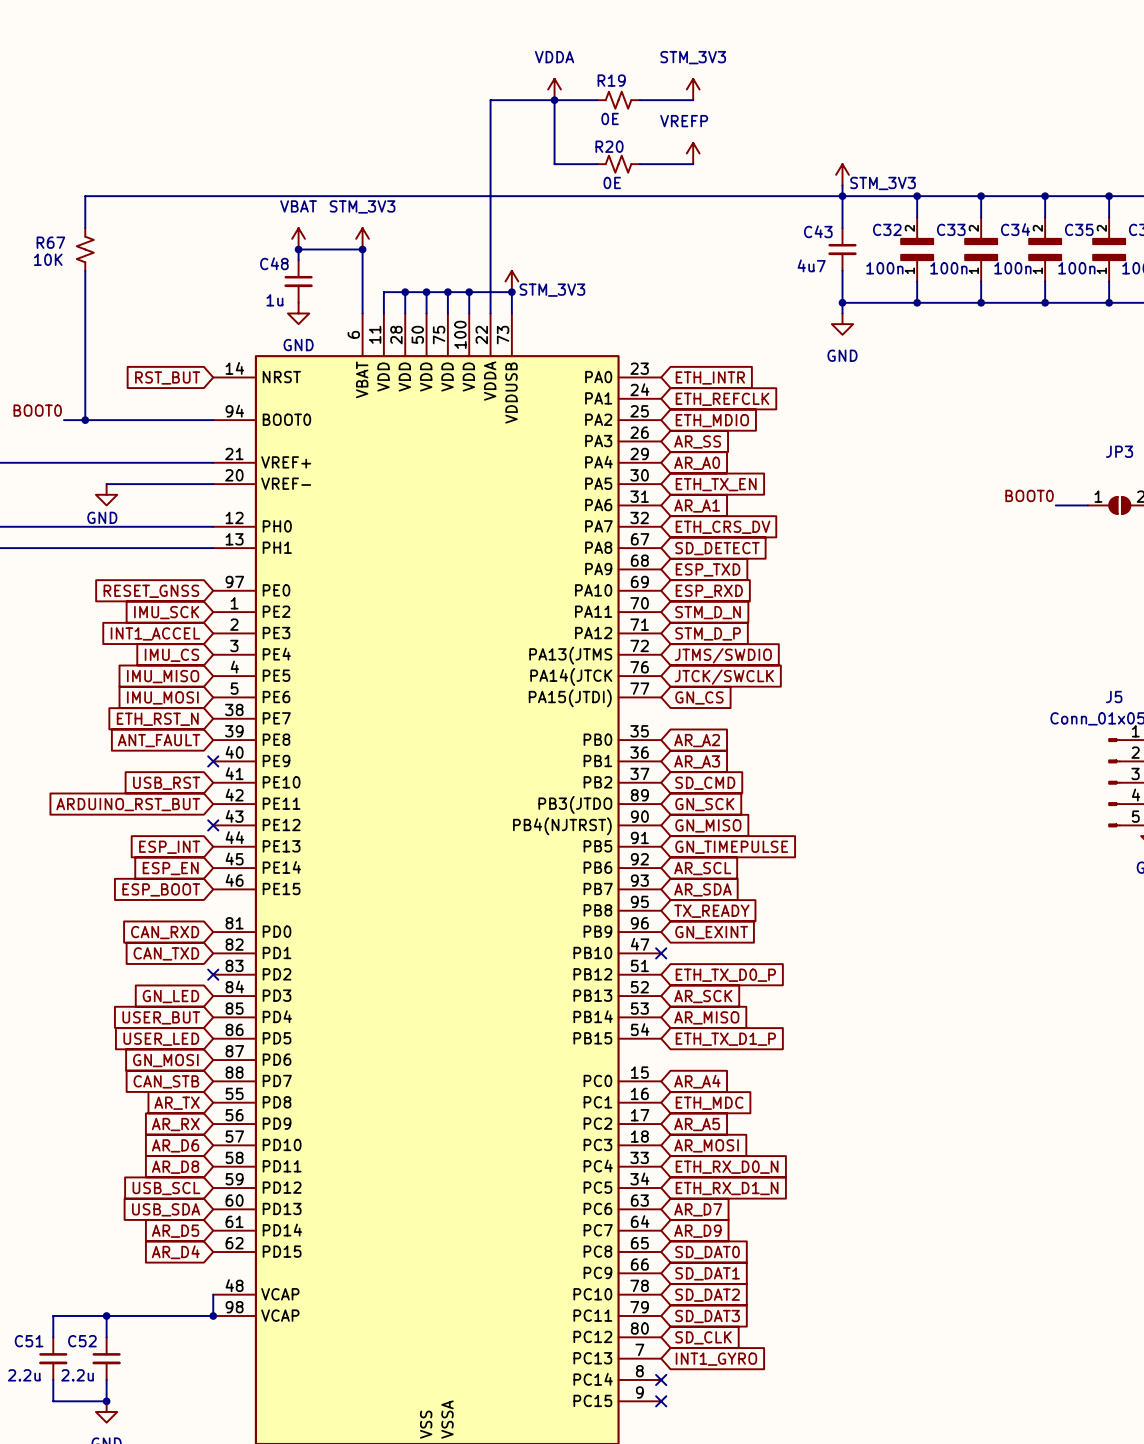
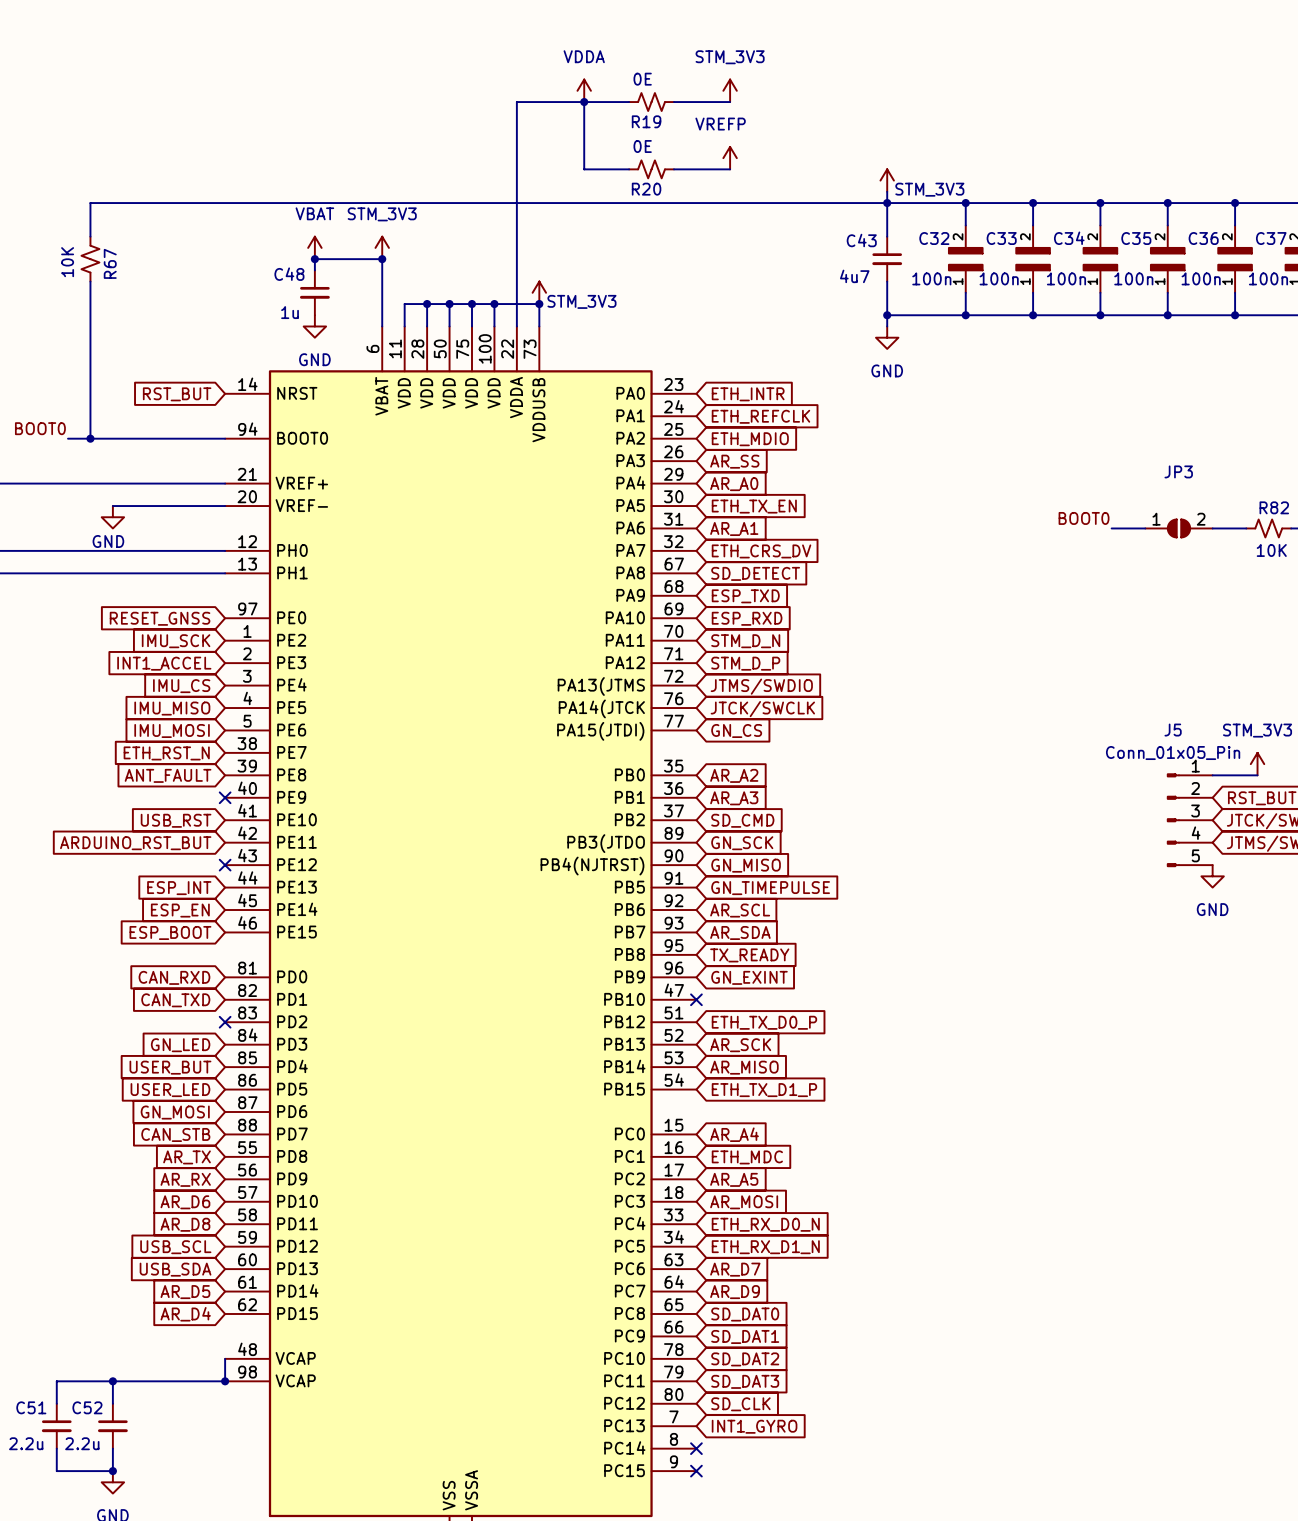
R19 name position: R19 (611, 80) -> R19 (646, 121)
R19 value position: 0E (610, 118) -> 0E (642, 79)
R20 name position: R20 (609, 146) -> R20 (646, 189)
R20 value position: 0E (612, 182) -> 0E (642, 146)
R67 name rotation: 0° (50, 242) -> 90° counterclockwise (110, 263)
R67 name position: R67 (50, 242) -> R67 (110, 263)
R67 value rotation: 0° (48, 259) -> 90° counterclockwise (67, 262)

